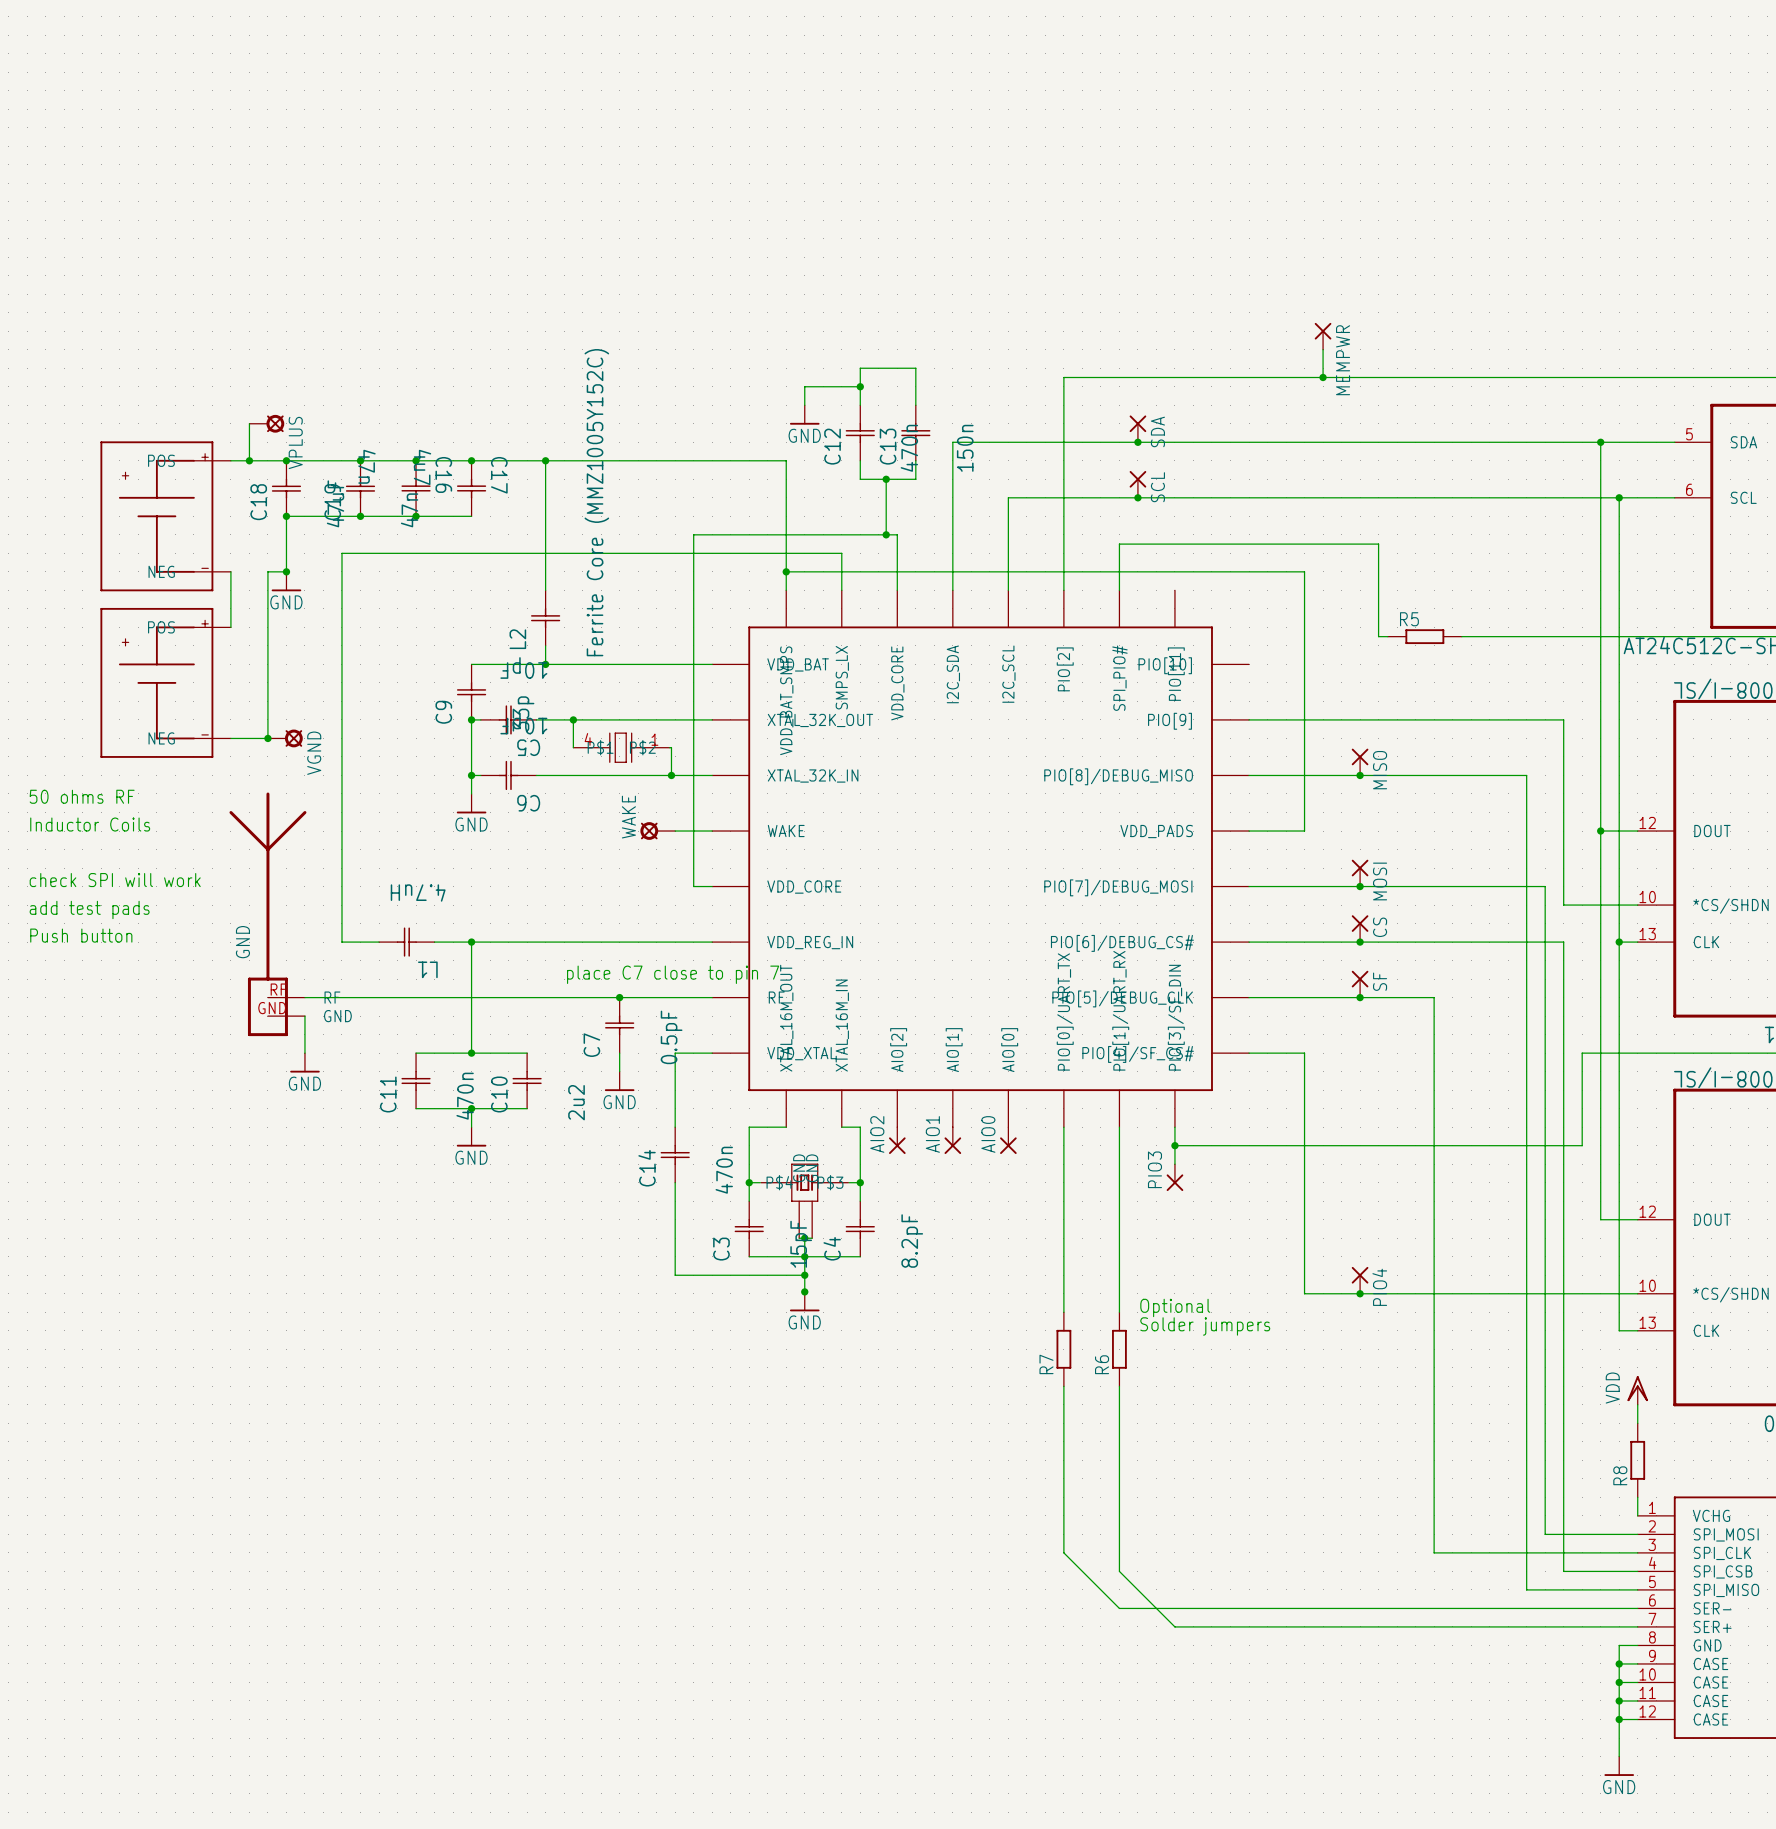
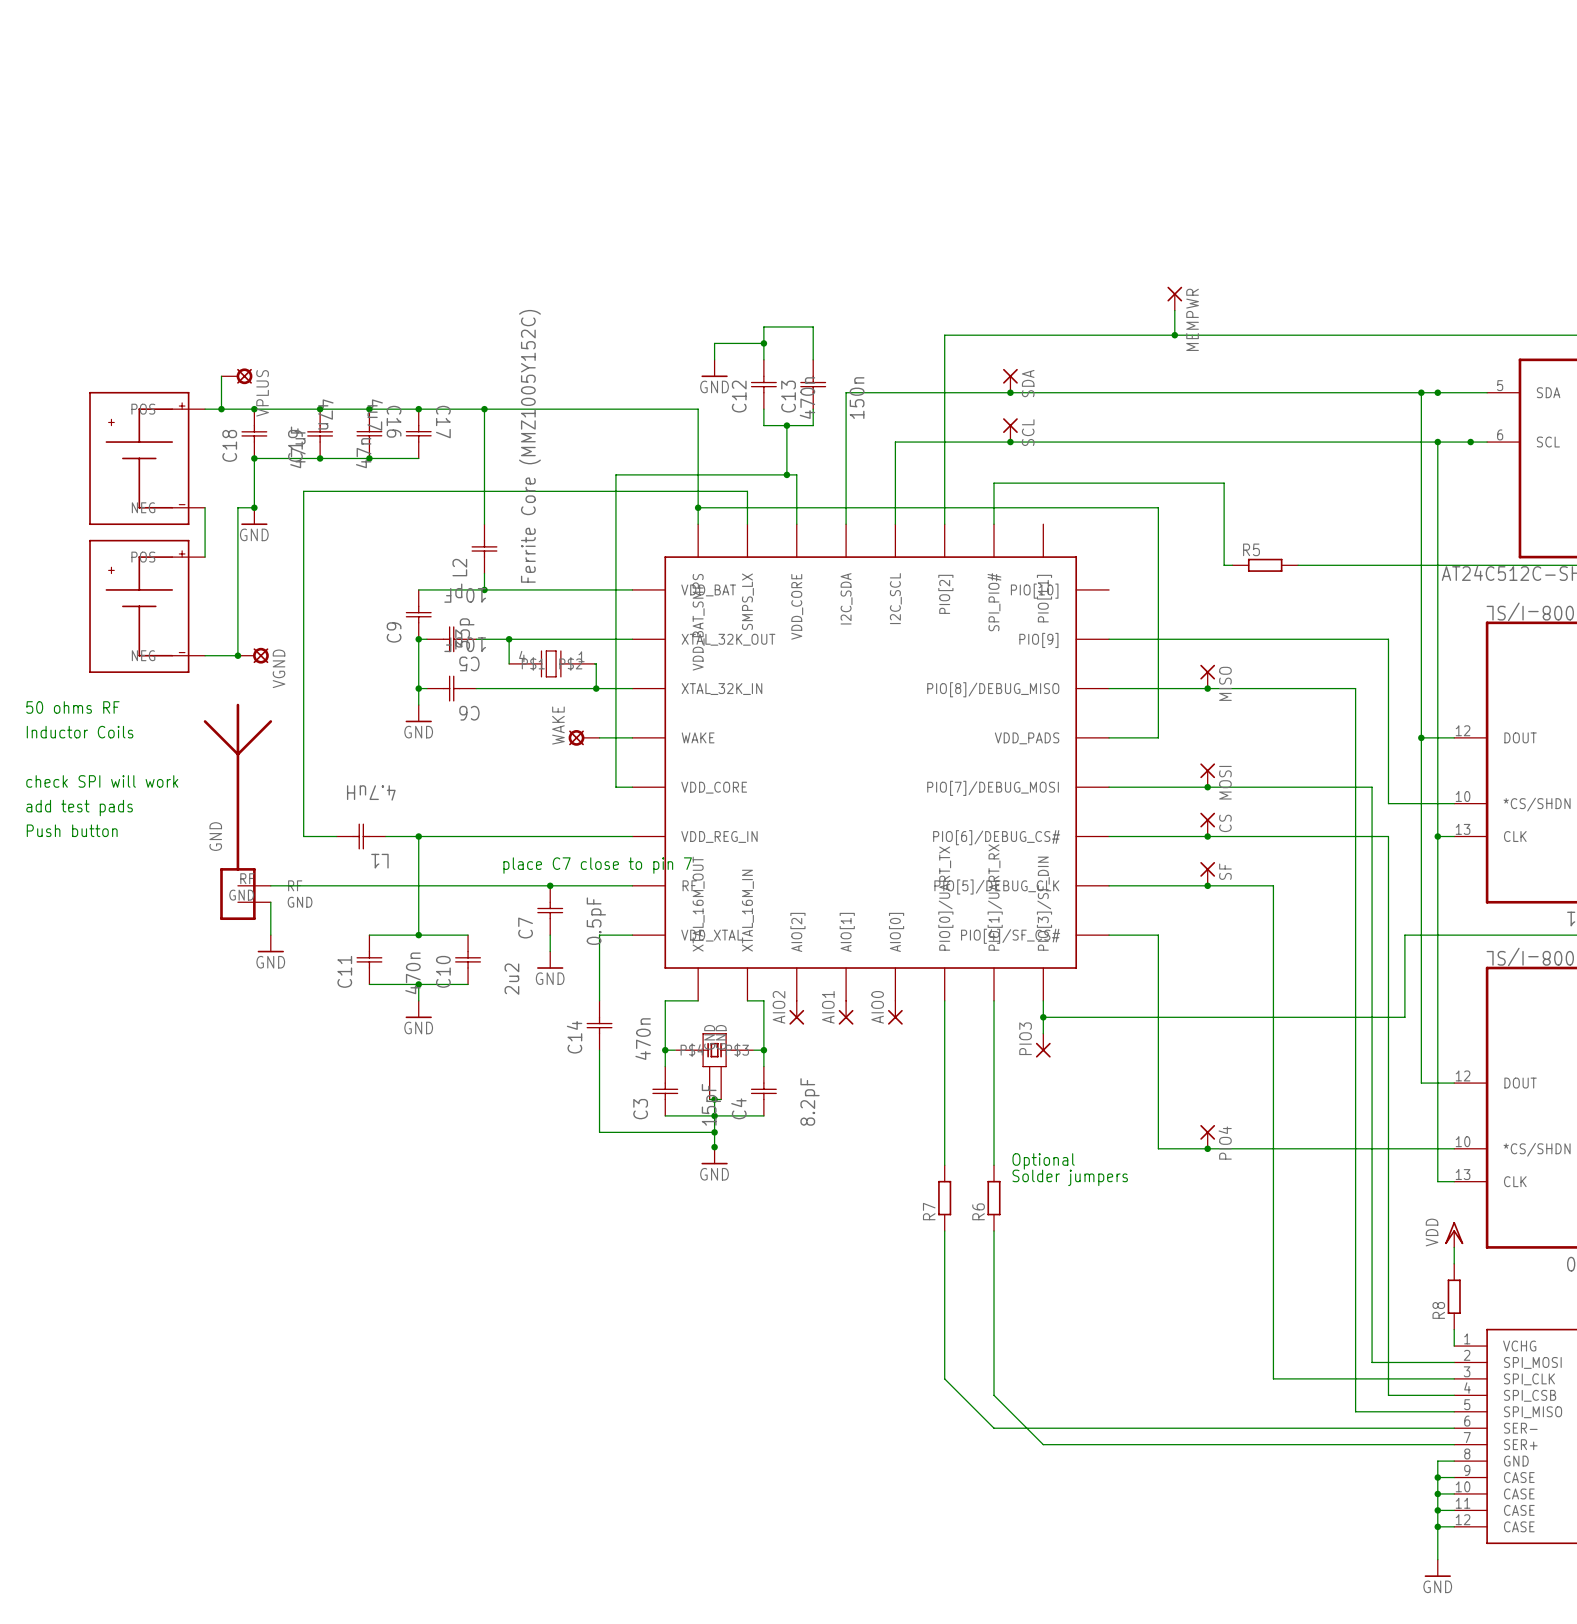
junction: none -> (1437, 392)
junction: none -> (1470, 442)

